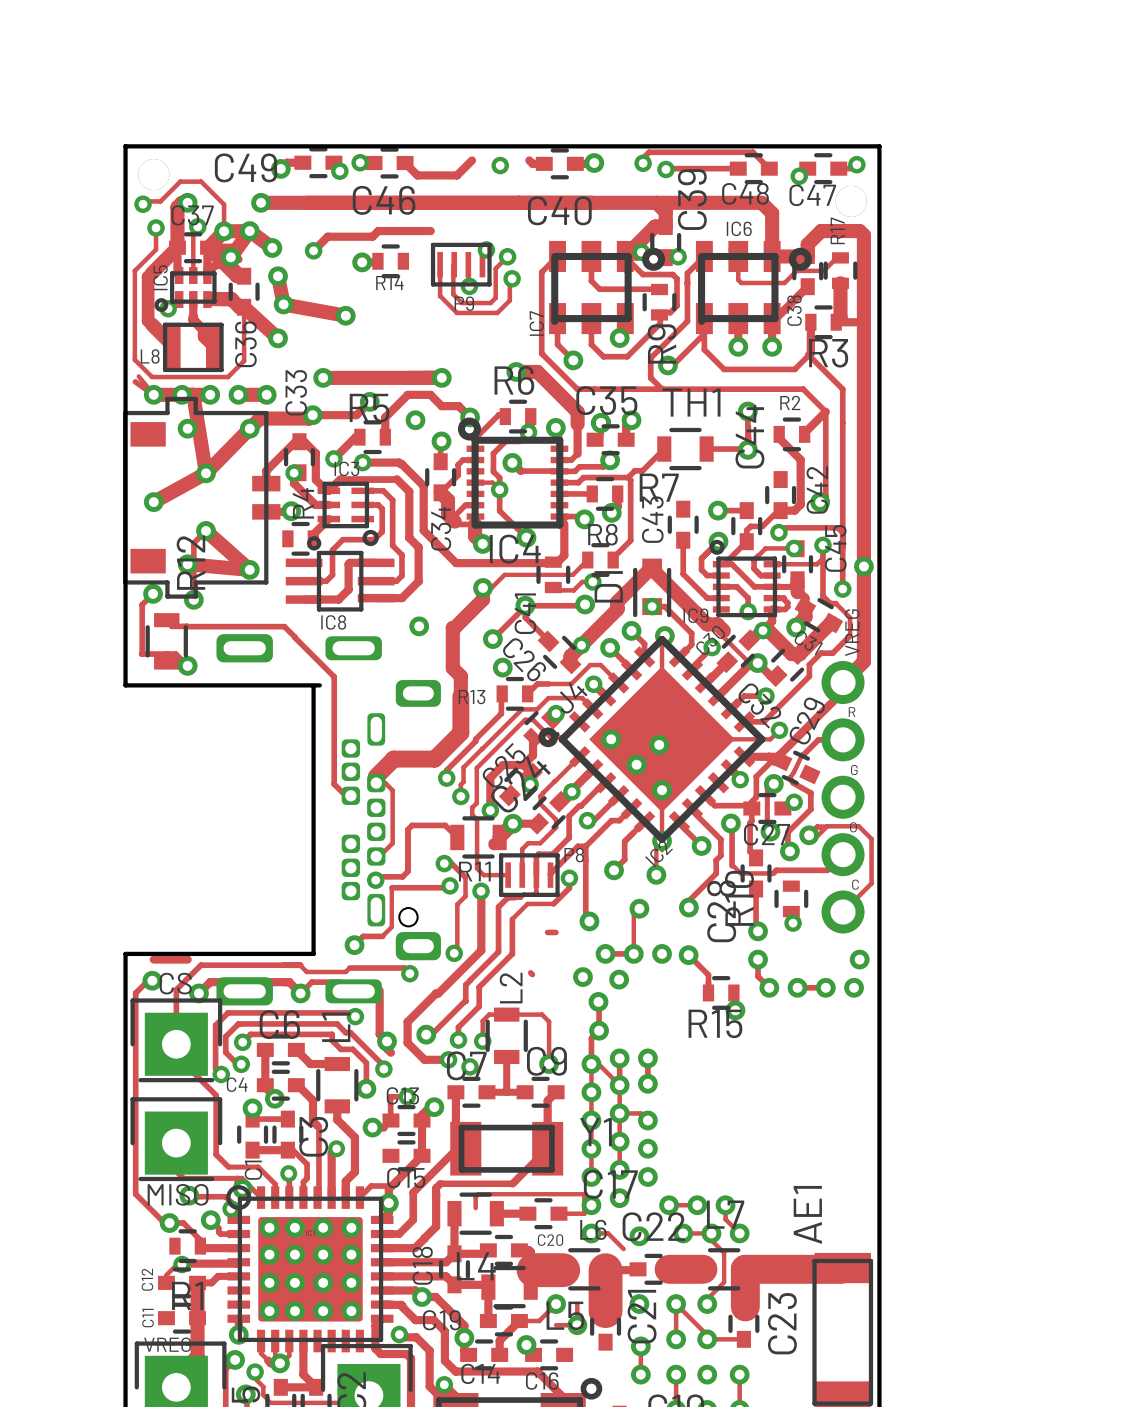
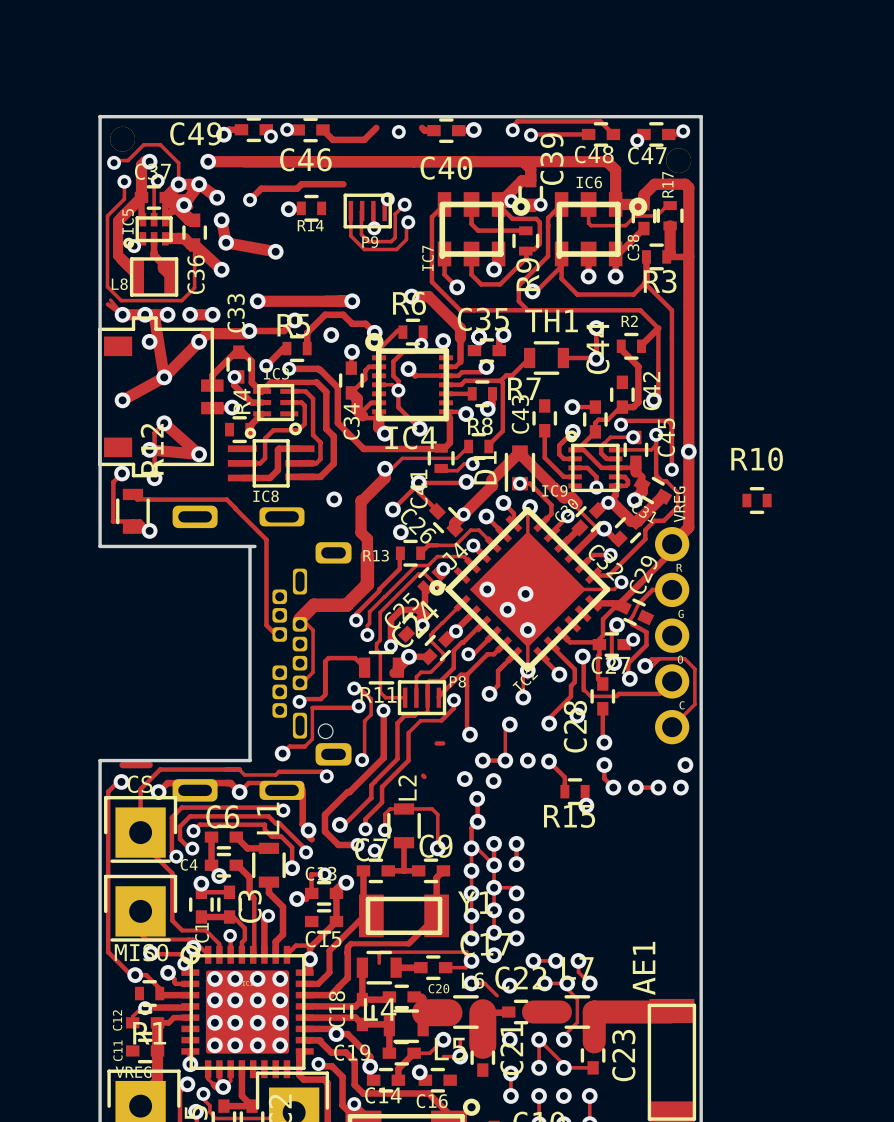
via: (740, 779) -> none
via: none -> (577, 715)
R10 rotation: 0° (791, 898) -> 90° clockwise (757, 500)
R10 position: (791, 898) -> (757, 500)
via: (793, 923) -> none

